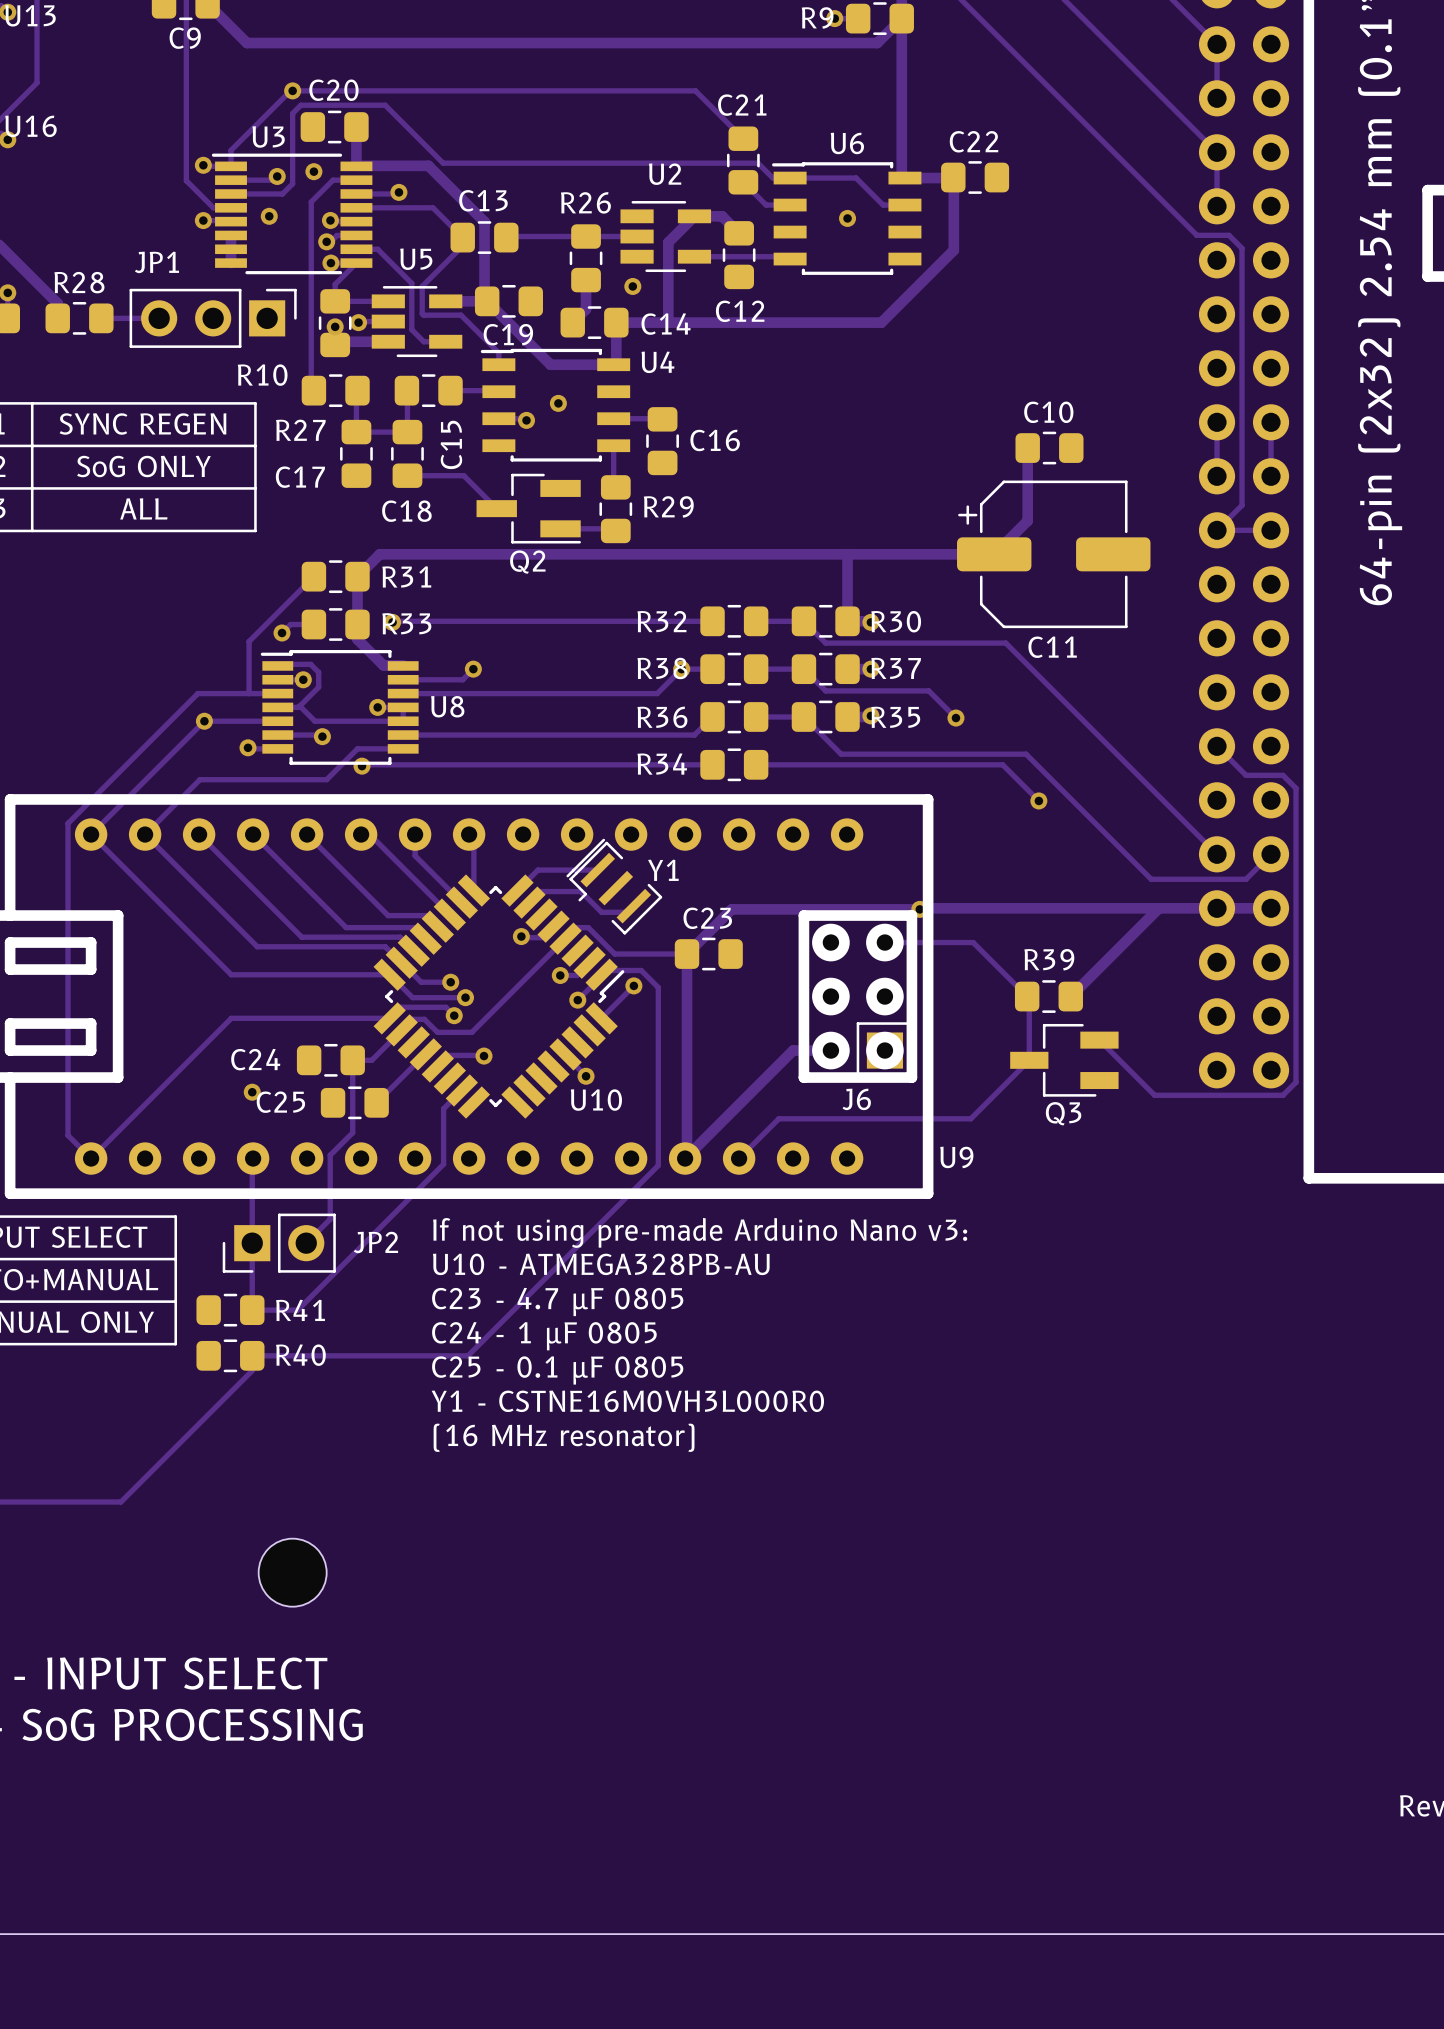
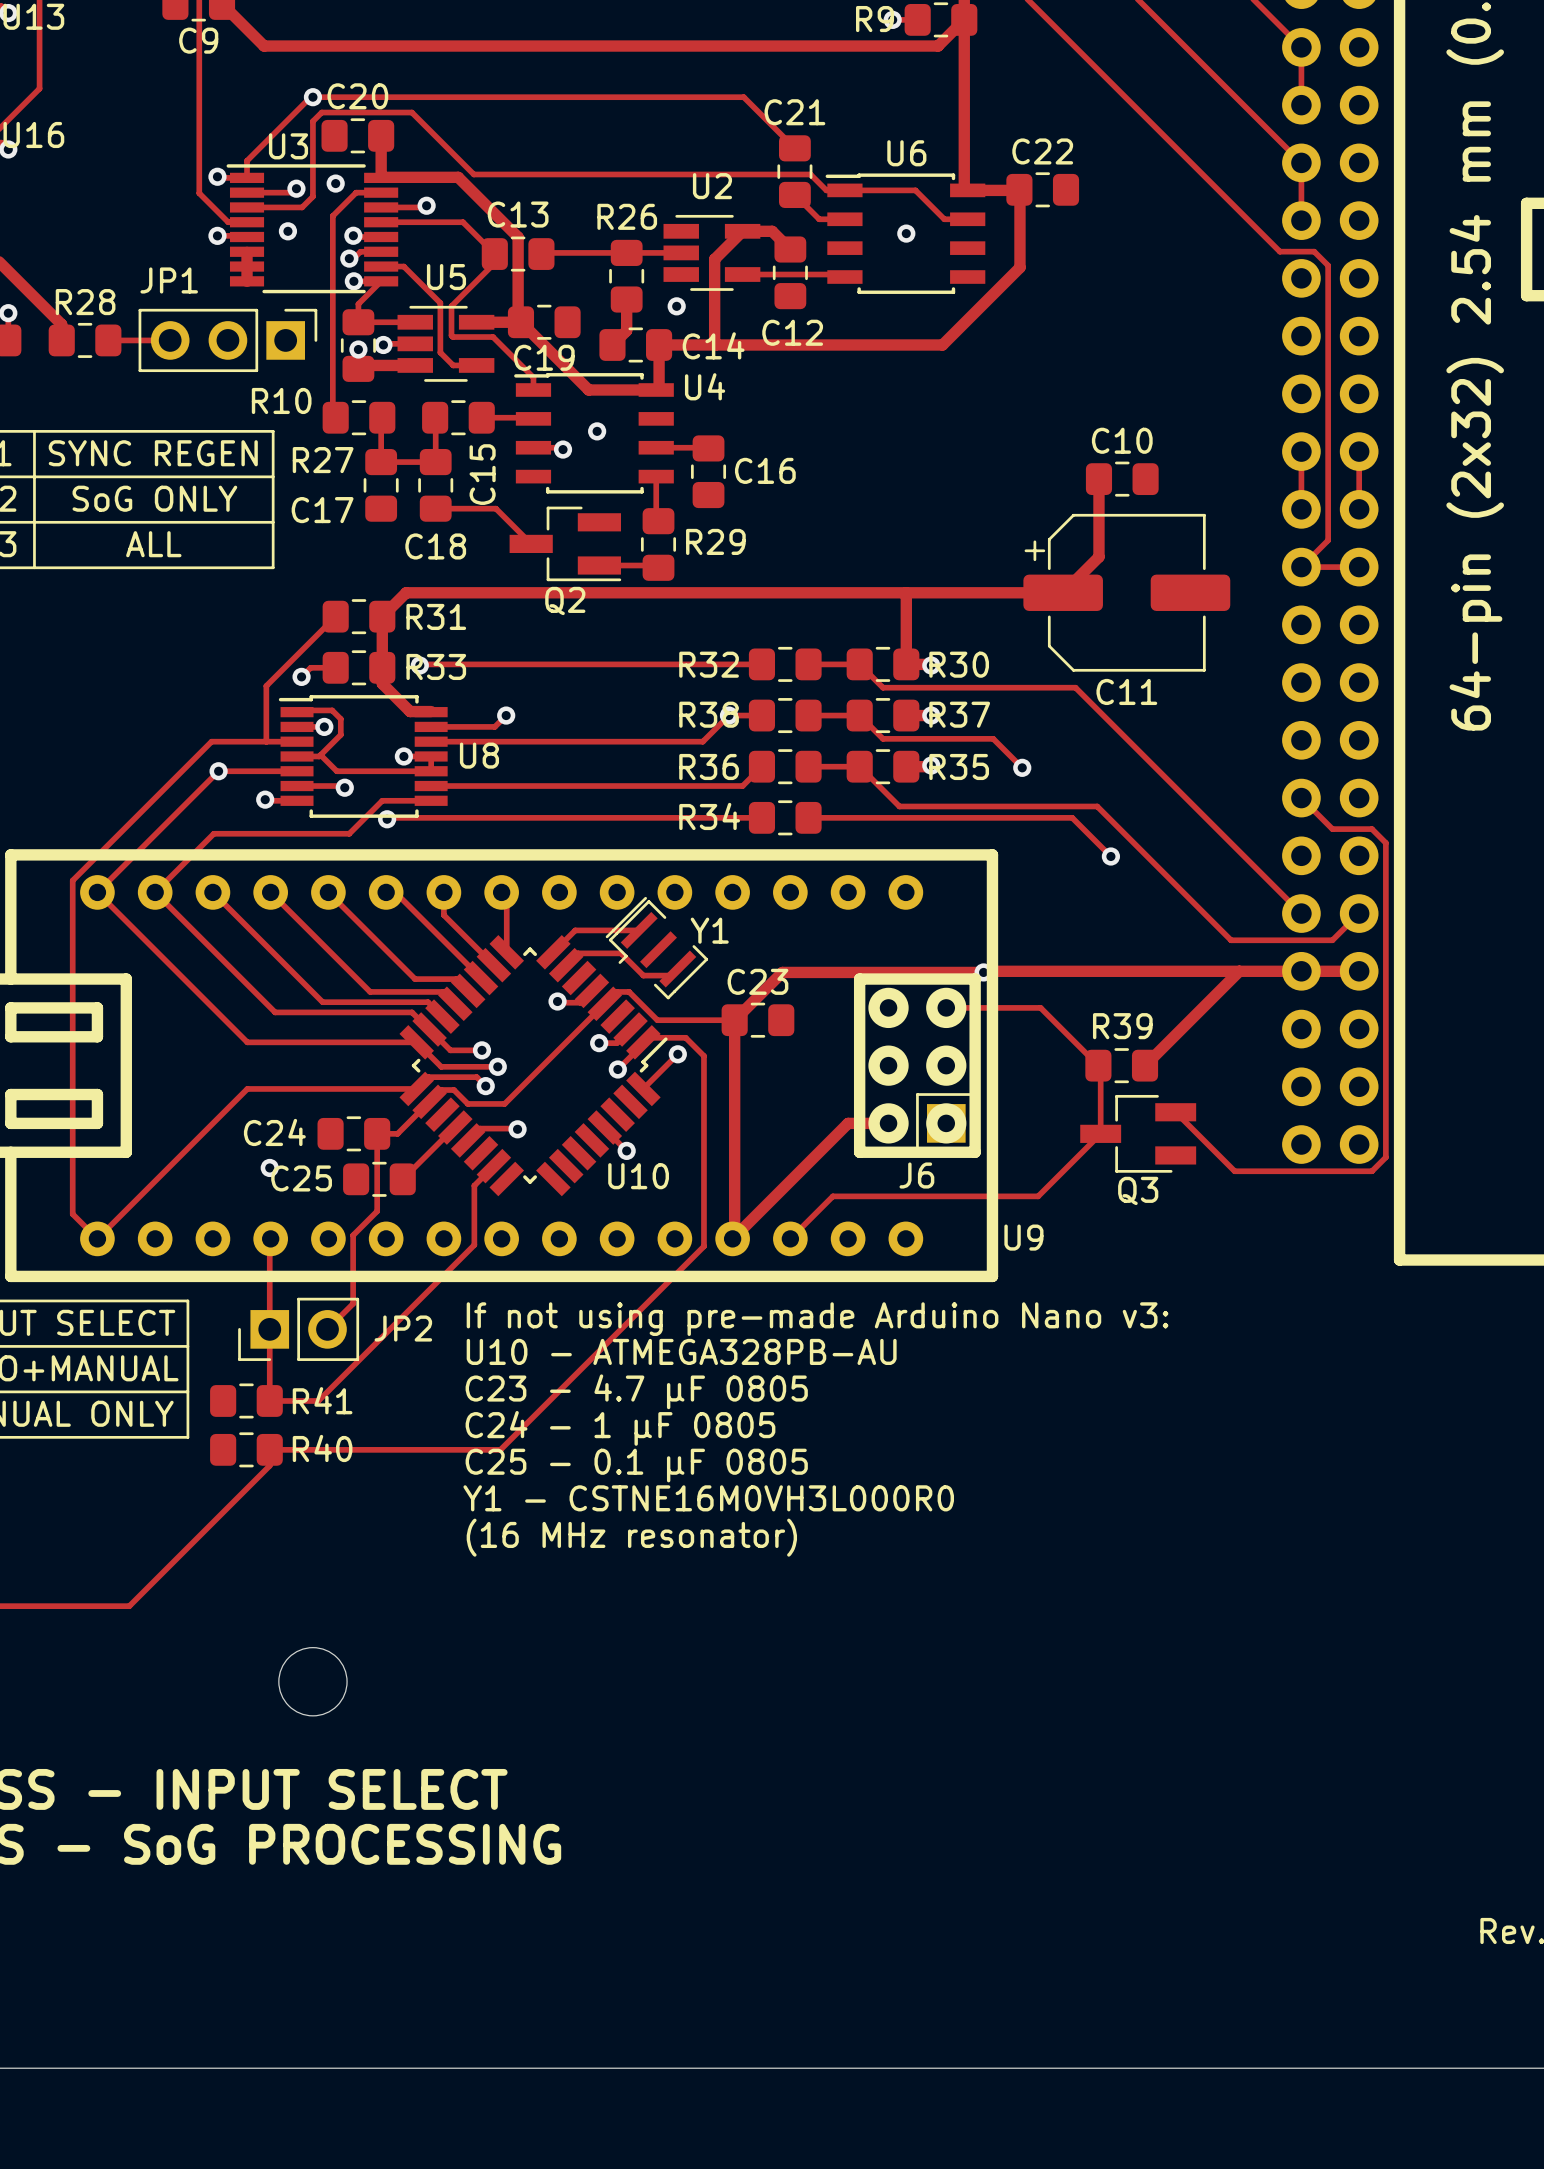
round board edge: none -> [278, 1647, 348, 1717]
part: (292, 1572) -> none

